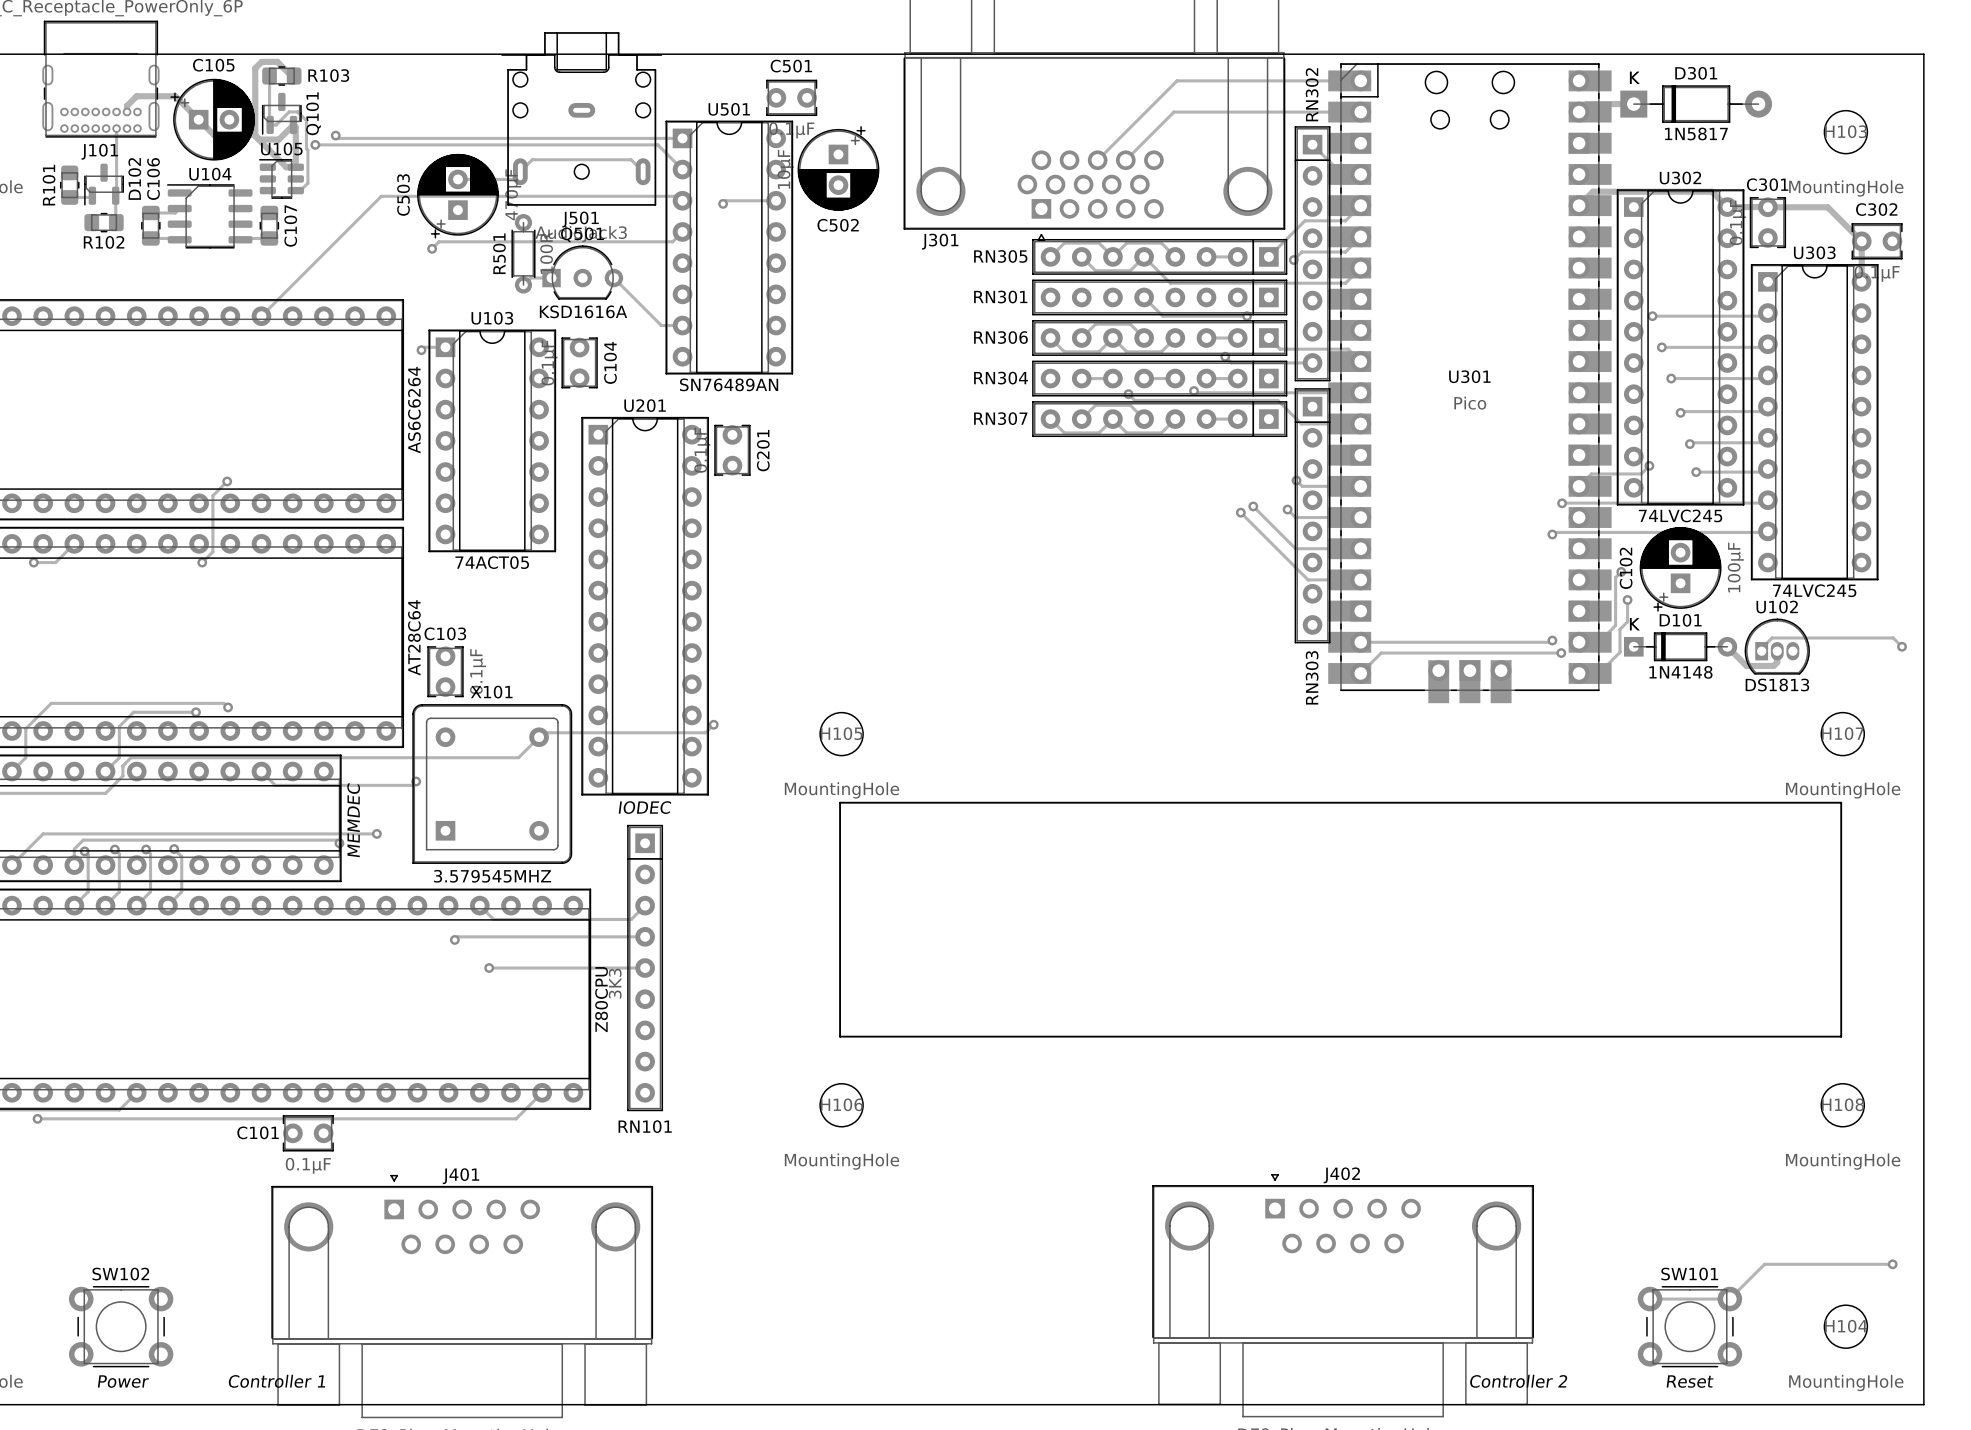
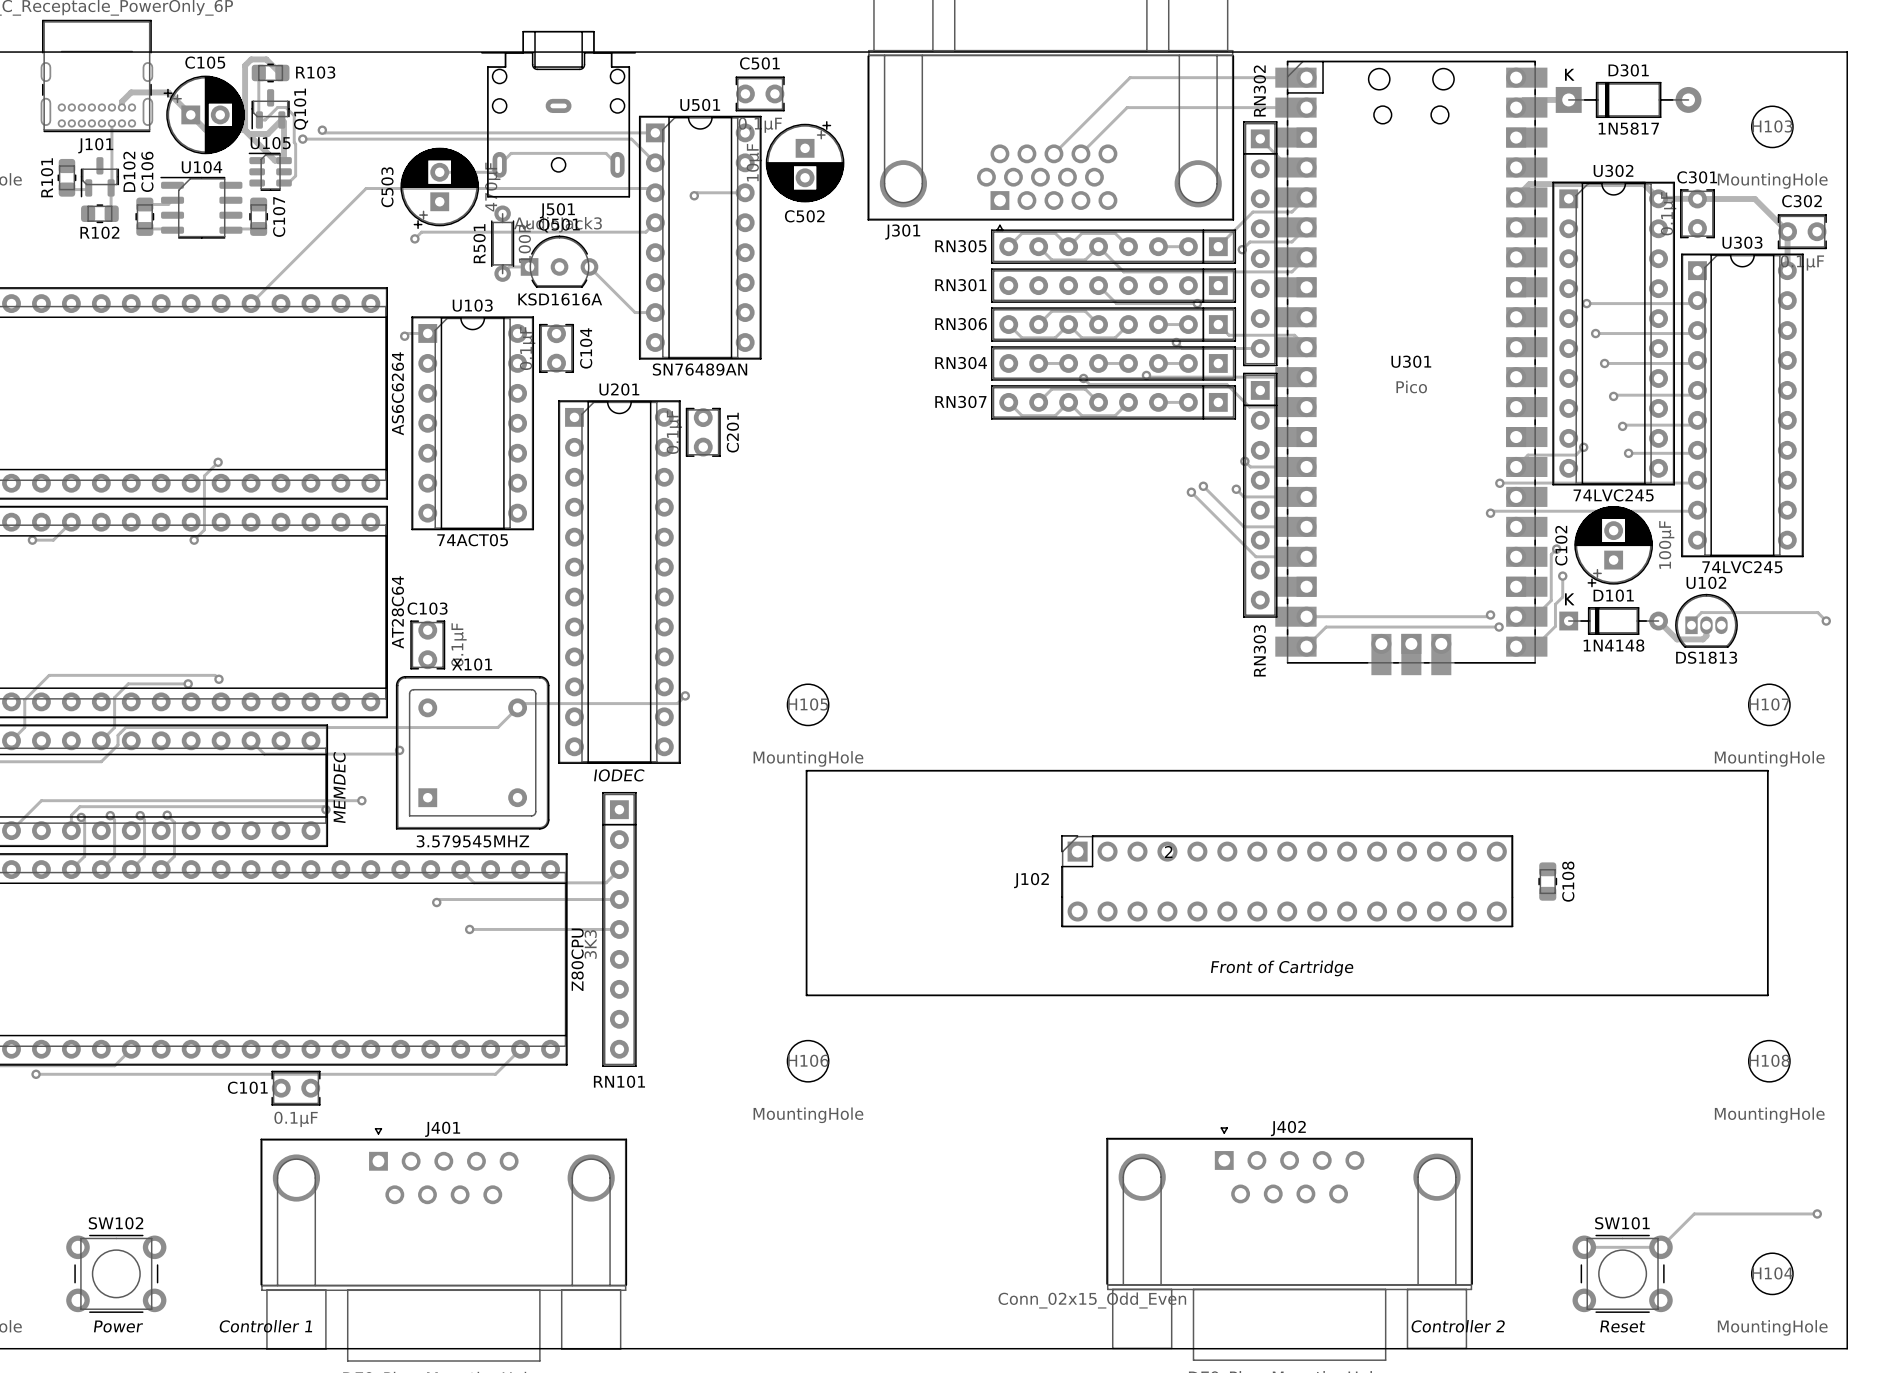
J102: none -> Conn_02x15_Odd_Even (1287, 881)
C108: none -> (1547, 881)
text: none -> Front of Cartridge (1282, 968)

